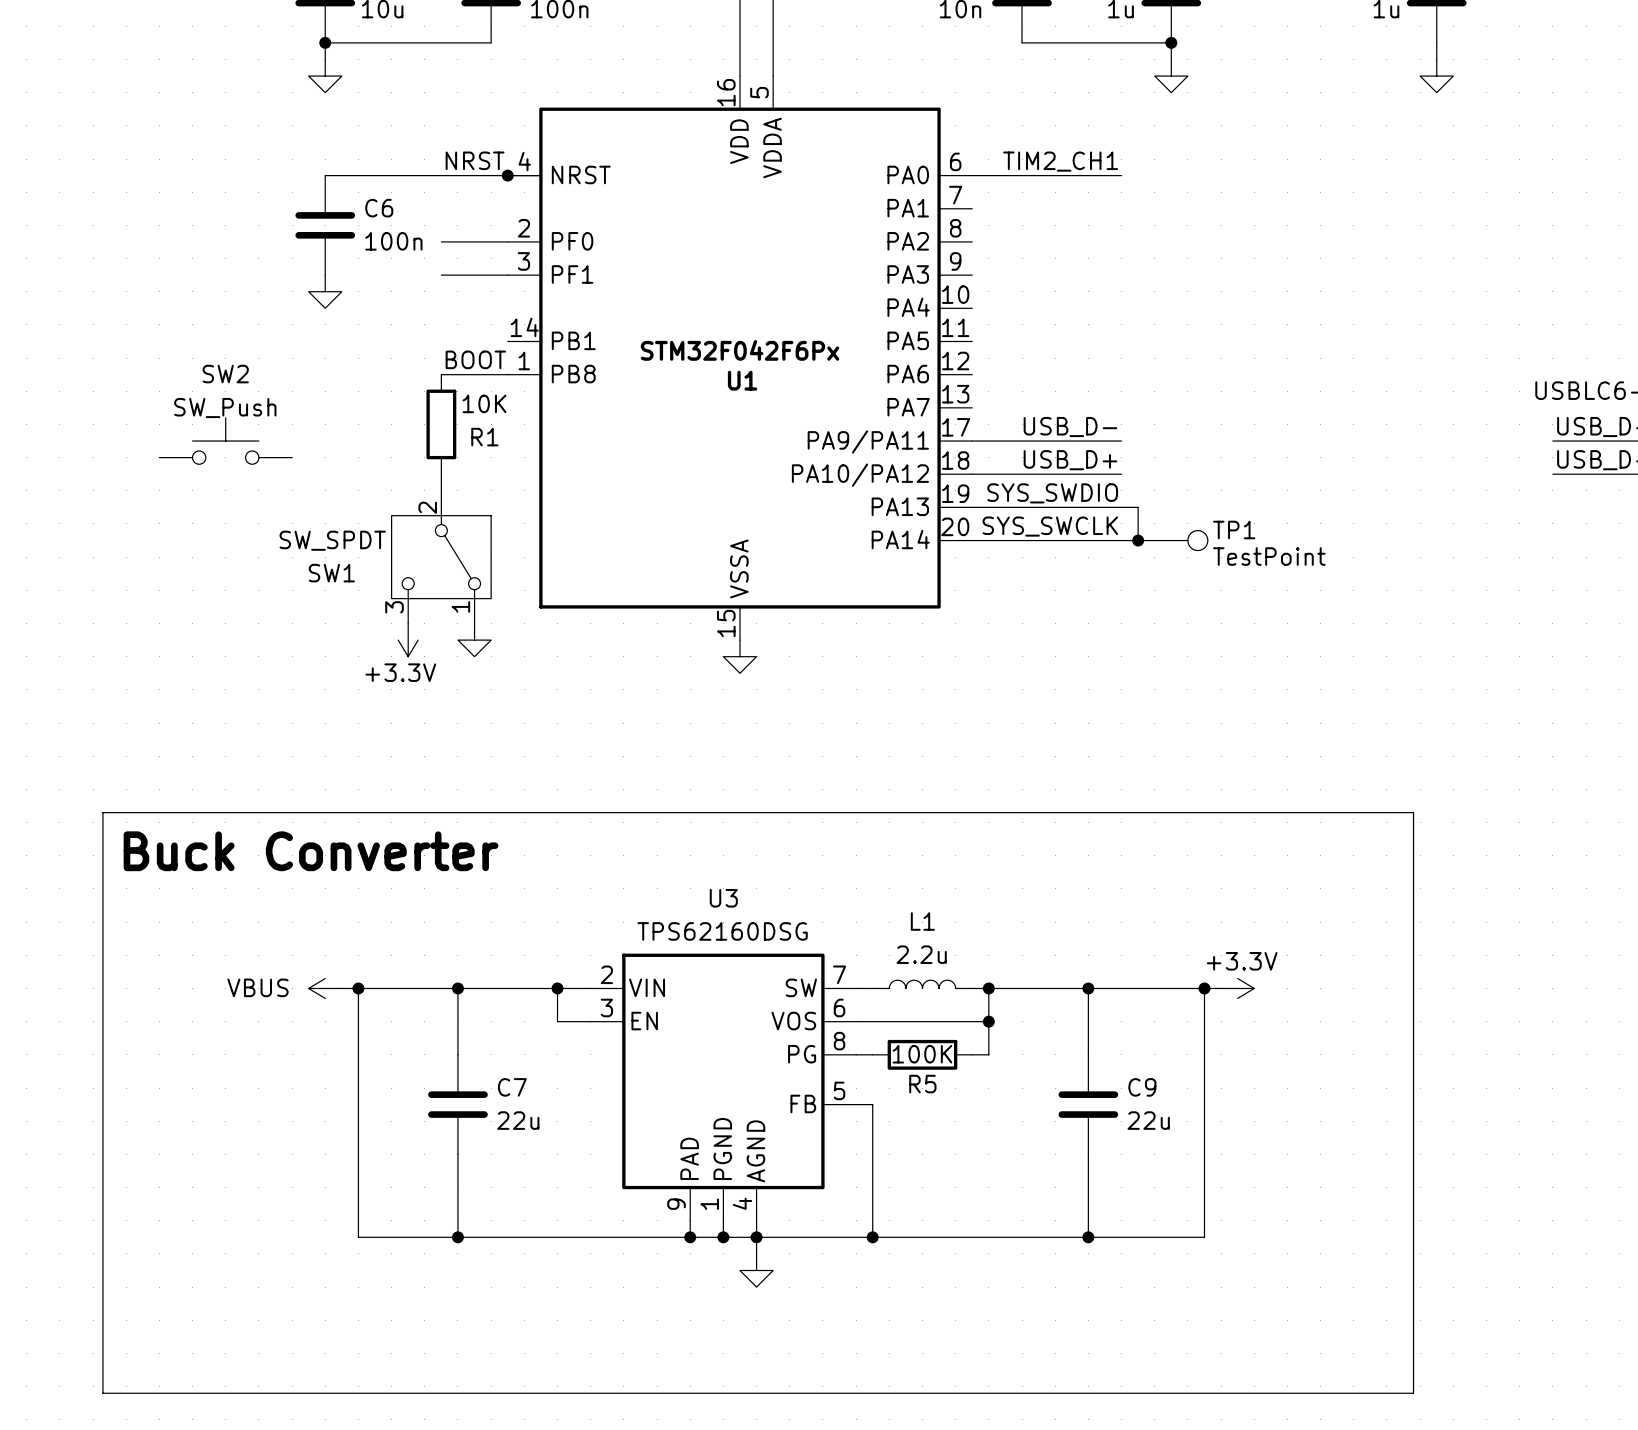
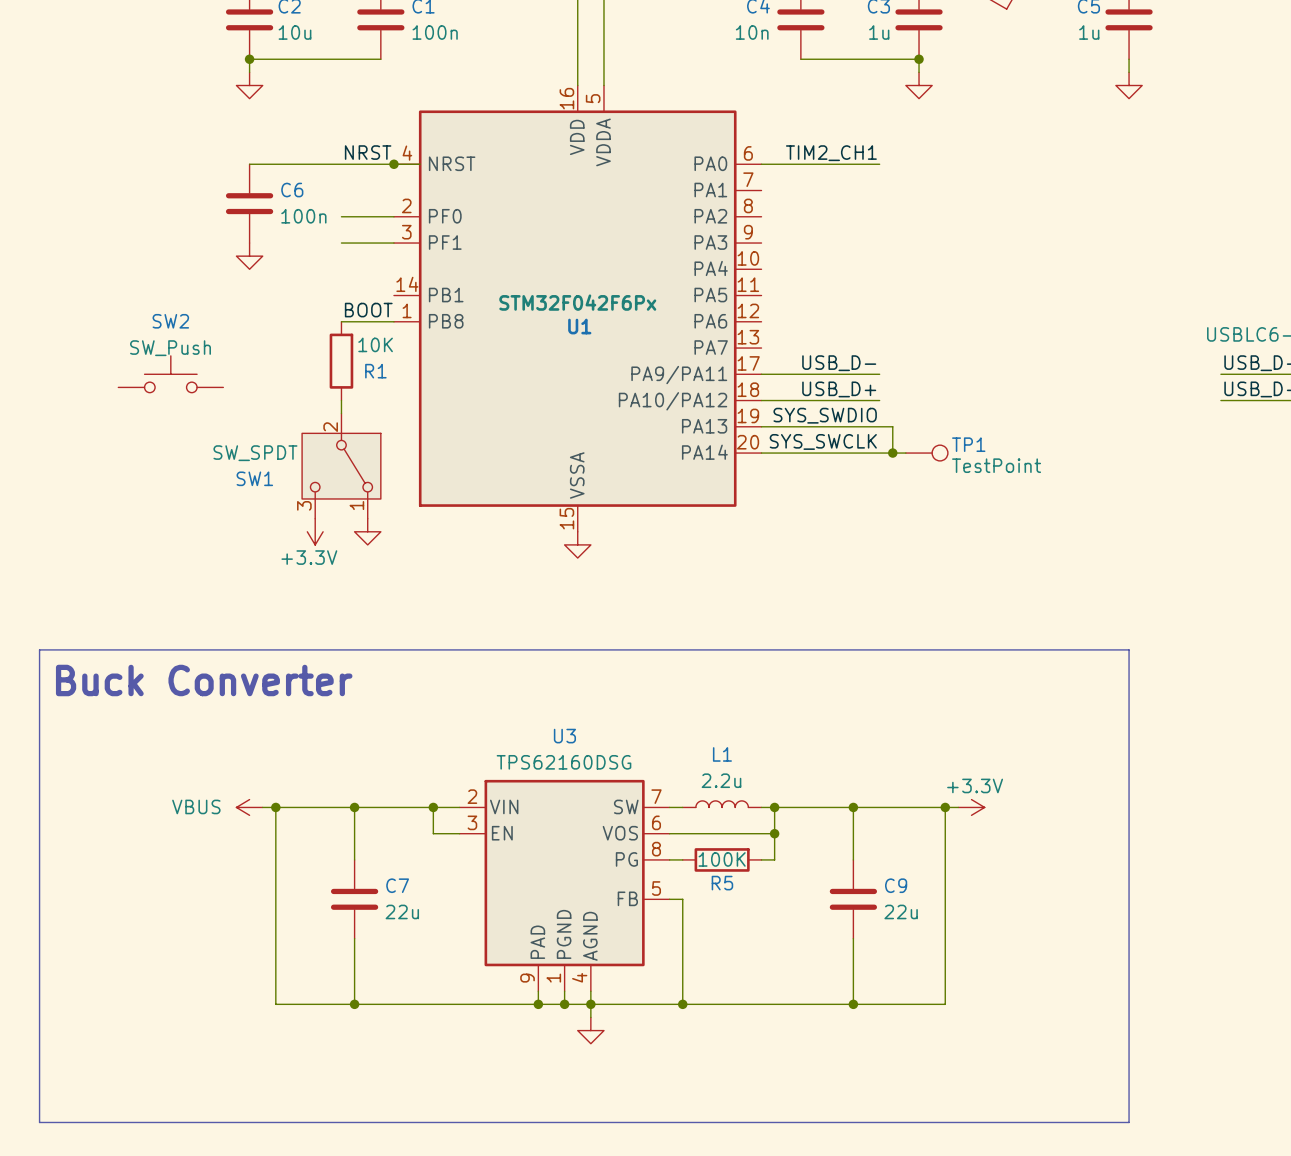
line: (102, 812) (1413, 812) (1413, 1393) (102, 1393) (102, 812) -> (39, 649) (39, 1122) (1129, 1122) (1129, 649) (39, 649)
text position: Buck Converter (311, 851) -> Buck Converter (204, 680)

